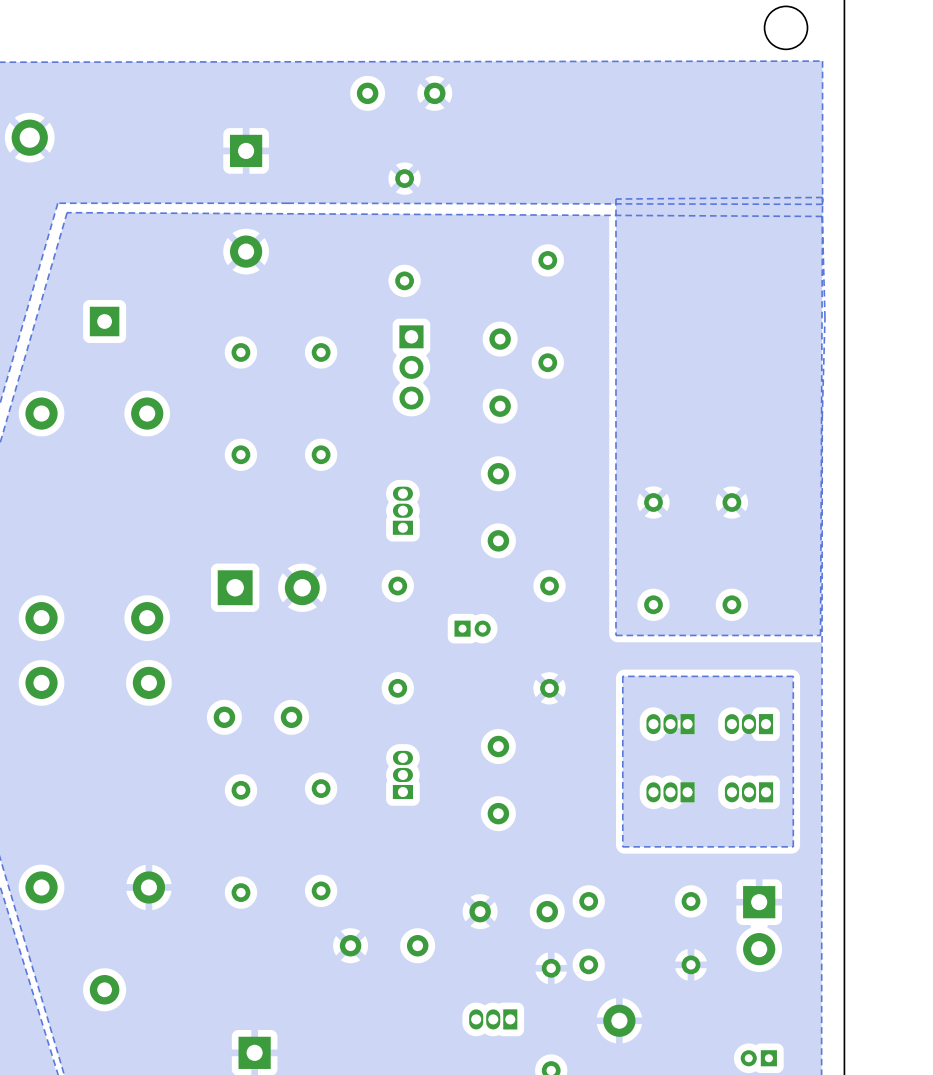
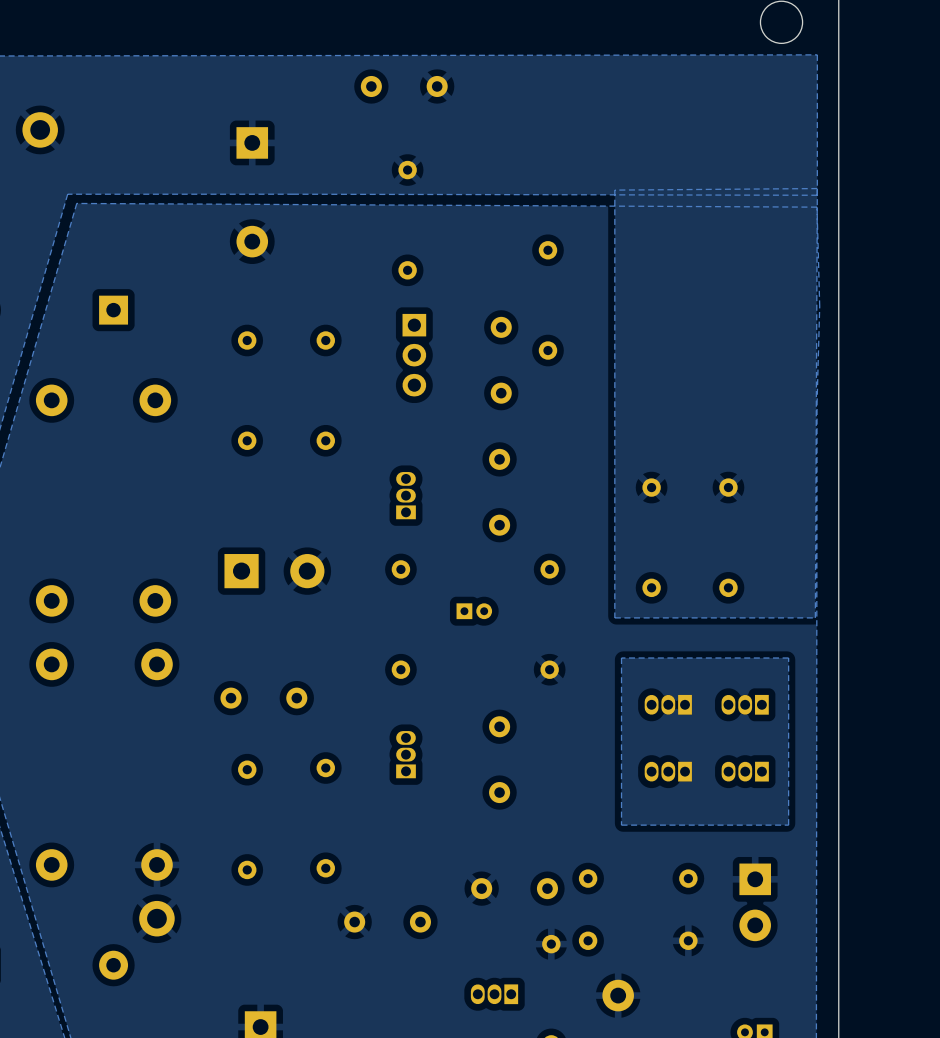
part: none -> (156, 918)

